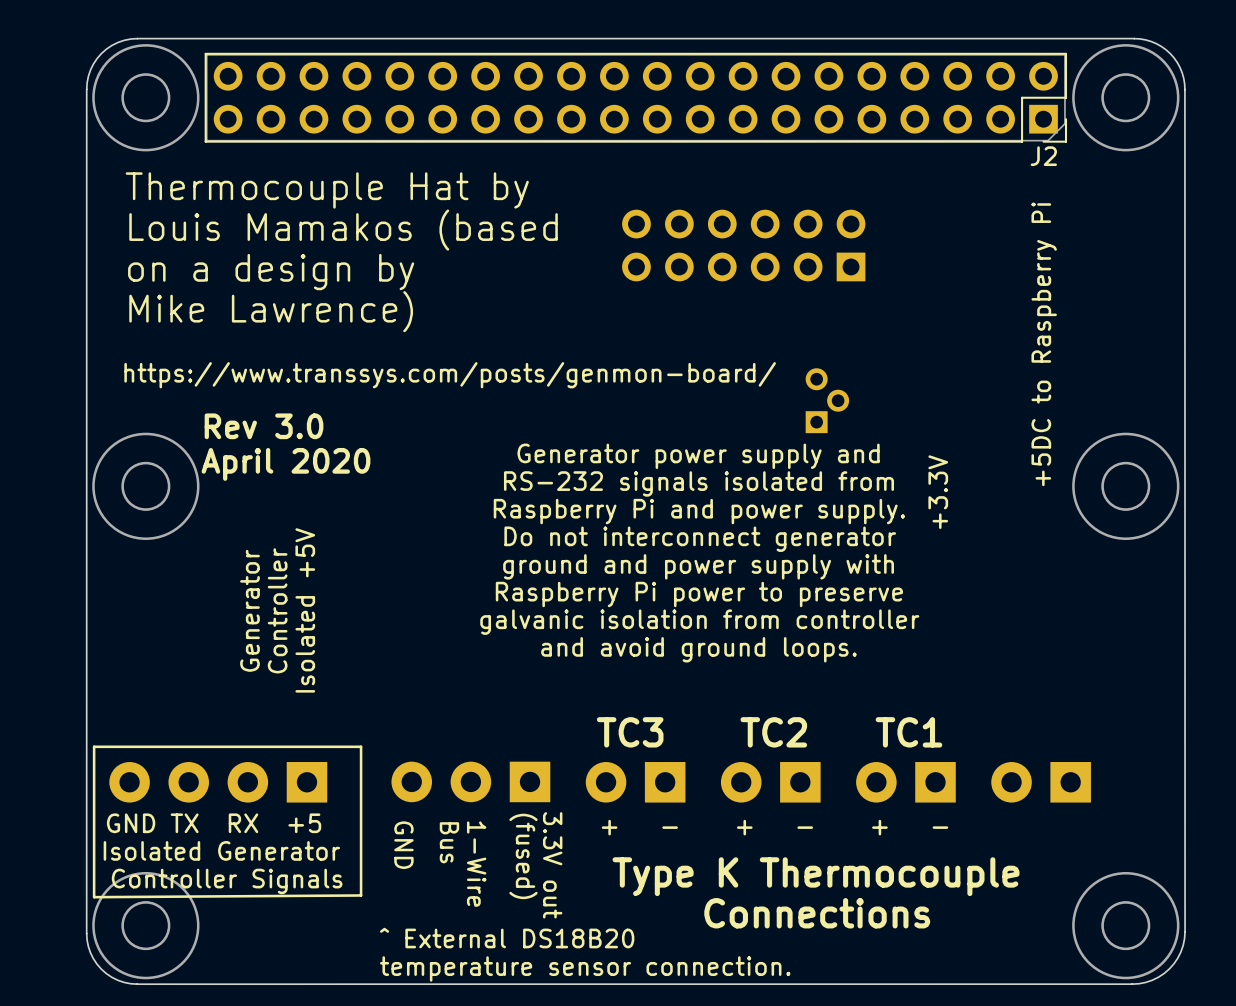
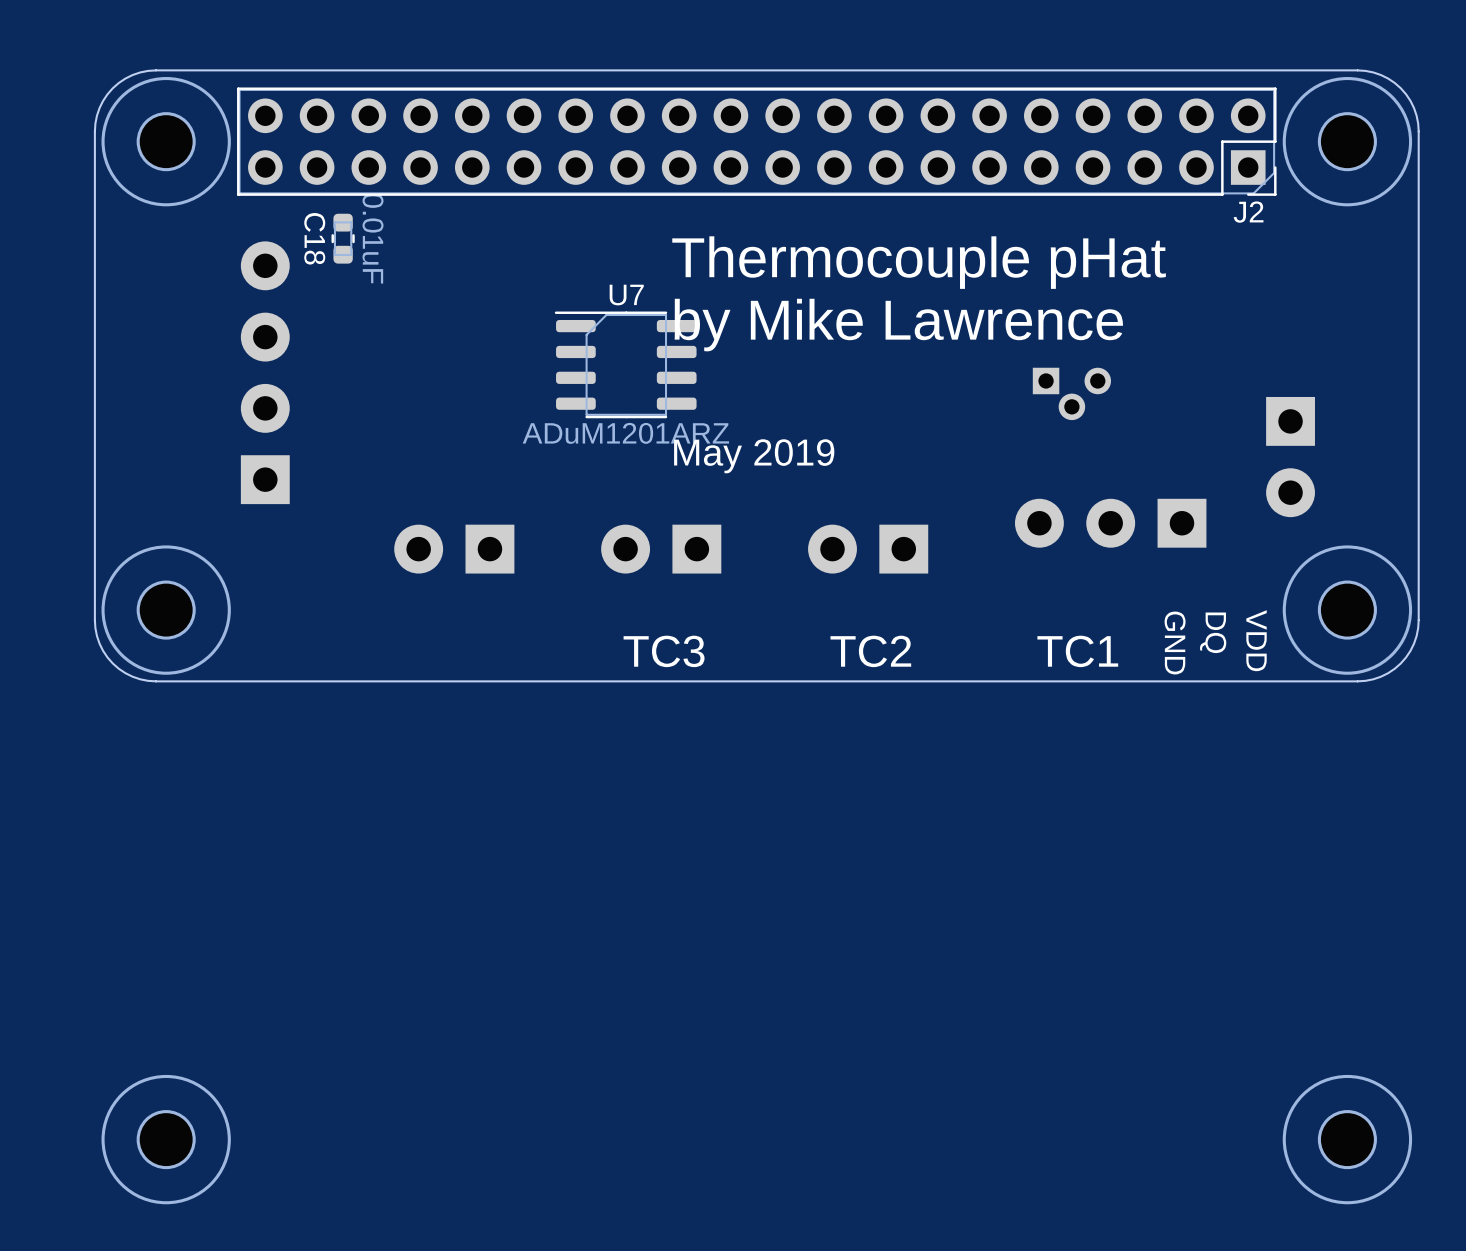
board edge: (1134, 38) (1156, 43) (1170, 53) (1180, 67) (1184, 89) (1185, 931) (1183, 945) (1177, 958) (1169, 968) (1152, 980) (1132, 984) (137, 984) (117, 980) (101, 969) (93, 958) (88, 946) (86, 933) (86, 494) -> (1357, 70) (1380, 75) (1400, 88) (1414, 108) (1418, 131) (1418, 628) (1414, 643) (1406, 657) (1394, 668) (1380, 676) (1357, 681) (155, 681) (132, 676) (112, 663) (99, 643) (94, 620)
C18: none -> 0.01uF (343, 238)
text: Thermocouple Hat by (327, 190) -> none
text: none -> Thermocouple pHat (919, 262)
text: Louis Mamakos (based (343, 230) -> none
part: (743, 245) -> none
text: none -> by Mike Lawrence (898, 325)
text: on a design by (271, 272) -> none
U7: none -> ADuM1201ARZ (625, 364)
part: none -> (265, 372)
text: Mike Lawrence) (271, 311) -> none
text: +5DC to Raspberry Pi (1044, 344) -> none
text: none -> May 2019 (754, 456)
part: none -> (1290, 457)
text: https://www.transsys.com/posts/genmon-board/ (450, 375) -> none
part rotation: 0° (827, 400) -> 90° clockwise (1071, 393)
part position: (827, 400) -> (1071, 393)
part: none -> (1110, 523)
text: Rev 3.0 (264, 426) -> none
part: none -> (454, 549)
part: none -> (661, 549)
part: none -> (868, 549)
text: Generator power supply and (698, 456) -> none
text: April 2020 (285, 464) -> none
text: RS-232 signals isolated from (698, 483) -> none
text: +3.3V (938, 492) -> none
text: none -> DQ (1213, 632)
text: Raspberry Pi and power supply. (699, 511) -> none
text: none -> VDD (1256, 640)
text: none -> GND (1175, 643)
text: Do not interconnect generator (700, 539) -> none
text: ground and power supply with (698, 566) -> none
text: Raspberry Pi power to preserve (699, 594) -> none
text: Generator (249, 610) -> none
text: Controller (277, 610) -> none
text: Isolated +5V (305, 610) -> none
text: galvanic isolation from controller (699, 622) -> none
text: and avoid ground loops. (698, 649) -> none
text position: TC3 (630, 732) -> TC3 (664, 651)
text position: TC2 (773, 732) -> TC2 (870, 651)
text position: TC1 (908, 732) -> TC1 (1077, 651)
line: (361, 746) (361, 895) (94, 897) (94, 746) (361, 746) -> none
part: (470, 781) -> none
part: (218, 782) -> none
part: (635, 782) -> none
part: (770, 782) -> none
part: (905, 782) -> none
part: (1041, 782) -> none
text: GND TX RX +5 (214, 823) -> none
text: + - (639, 827) -> none
text: + - (775, 827) -> none
text: + - (910, 827) -> none
text: Bus (449, 842) -> none
text: GND (403, 845) -> none
text: Isolated Generator (221, 850) -> none
text: (fused) (523, 856) -> none
text: 1-Wire (476, 864) -> none
text: 3.3V out (552, 865) -> none
text: Type K Thermocouple (816, 876) -> none
text: Controller Signals (227, 881) -> none
text: Connections (817, 913) -> none
text: ^ External DS18B20 (507, 938) -> none
text: temperature sensor connection. (585, 968) -> none

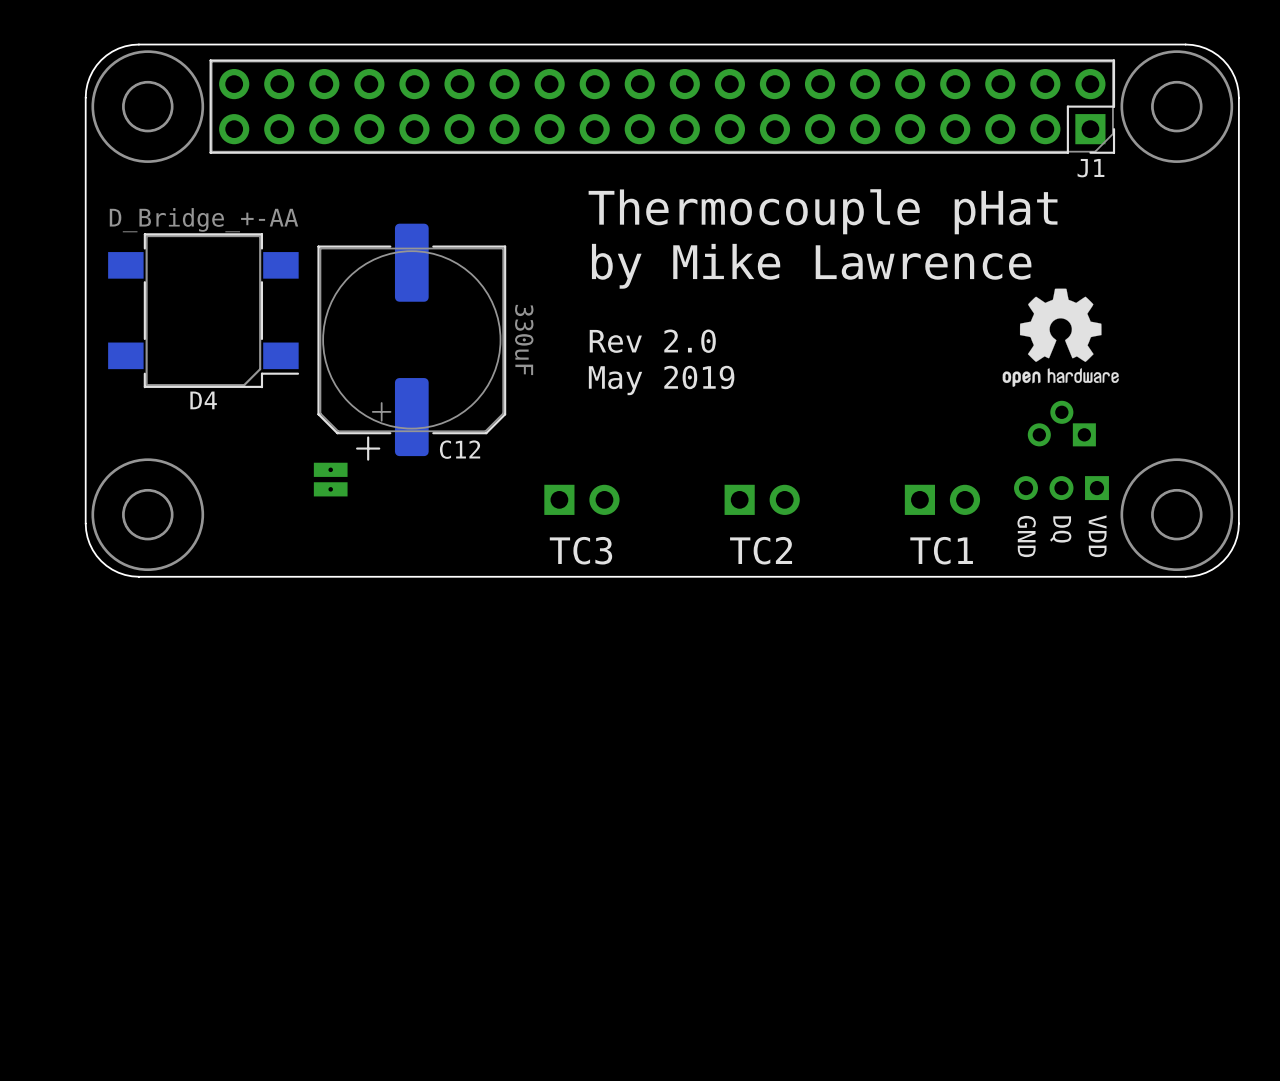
J2 name: J2 (1248, 212) -> J1 (1090, 168)
C18: 0.01uF (343, 238) -> none
drawing: none -> [1002, 288, 1119, 387]
U7: ADuM1201ARZ (625, 364) -> none
part: (265, 372) -> none
D4: none -> D_Bridge_+-AA (203, 310)
part rotation: 0° (1071, 393) -> 180° (1061, 423)
part position: (1071, 393) -> (1061, 423)
text: none -> Rev 2.0 (652, 341)
C12: none -> 330uF (411, 342)
part: (1290, 457) -> none
part: (1110, 523) -> none
part: (454, 549) -> none
part: (661, 549) -> none
part: (868, 549) -> none
part: none -> (330, 479)
part: none -> (1061, 488)
part: none -> (581, 499)
part: none -> (762, 499)
part: none -> (942, 499)
part: (166, 1139) -> none
part: (1347, 1139) -> none

